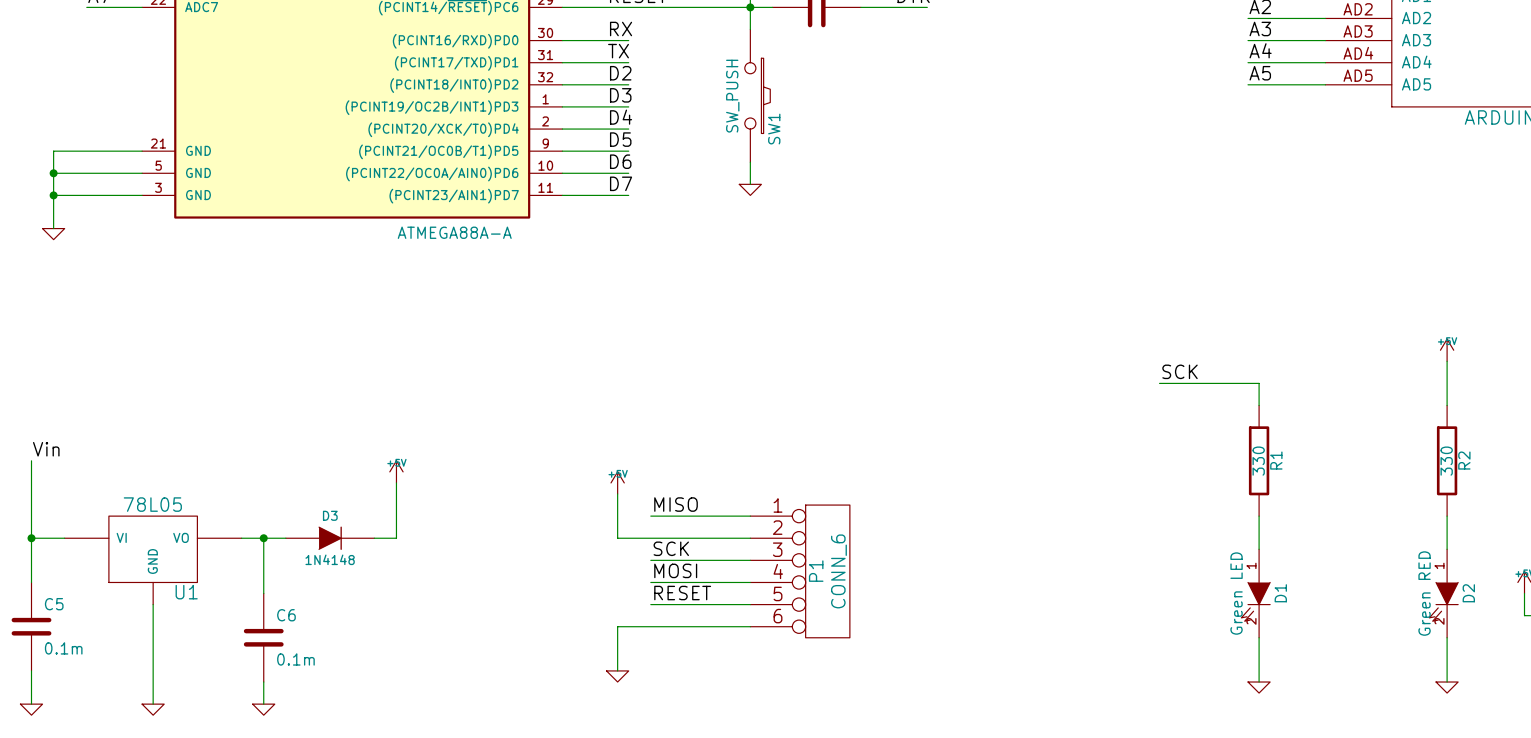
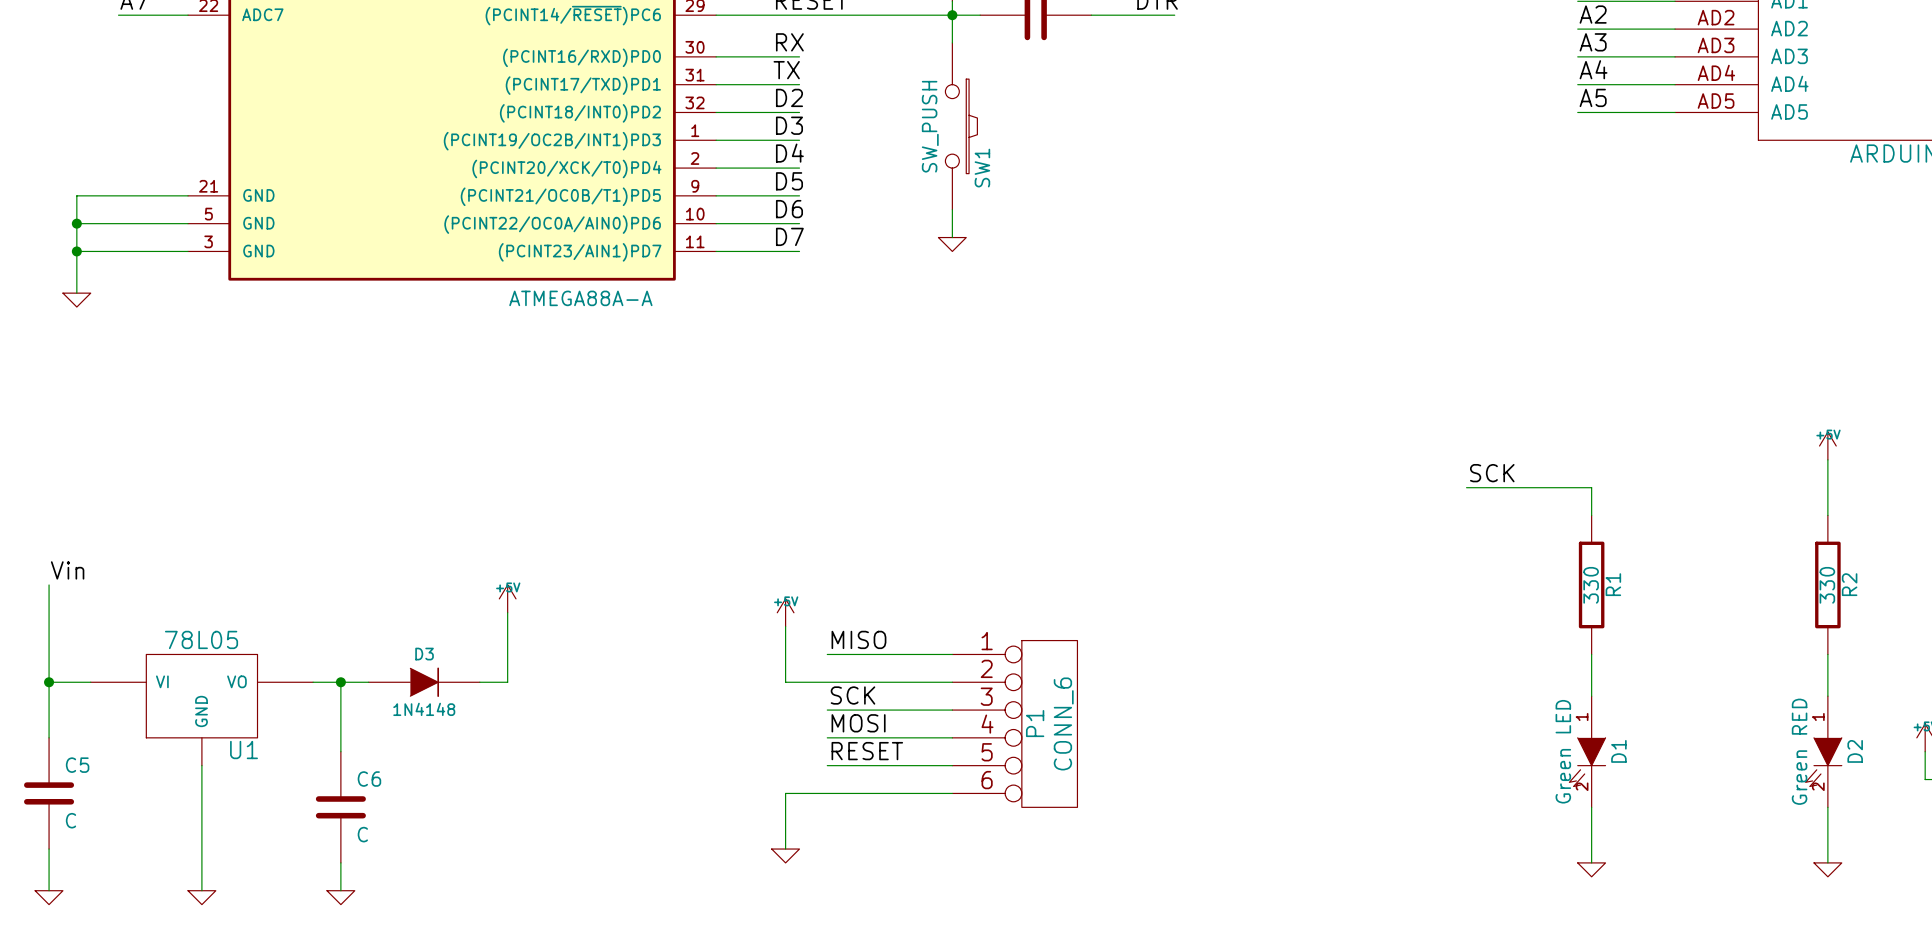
C5 value: 0.1m (63, 648) -> C (70, 820)
C6 value: 0.1m (295, 659) -> C (362, 834)

